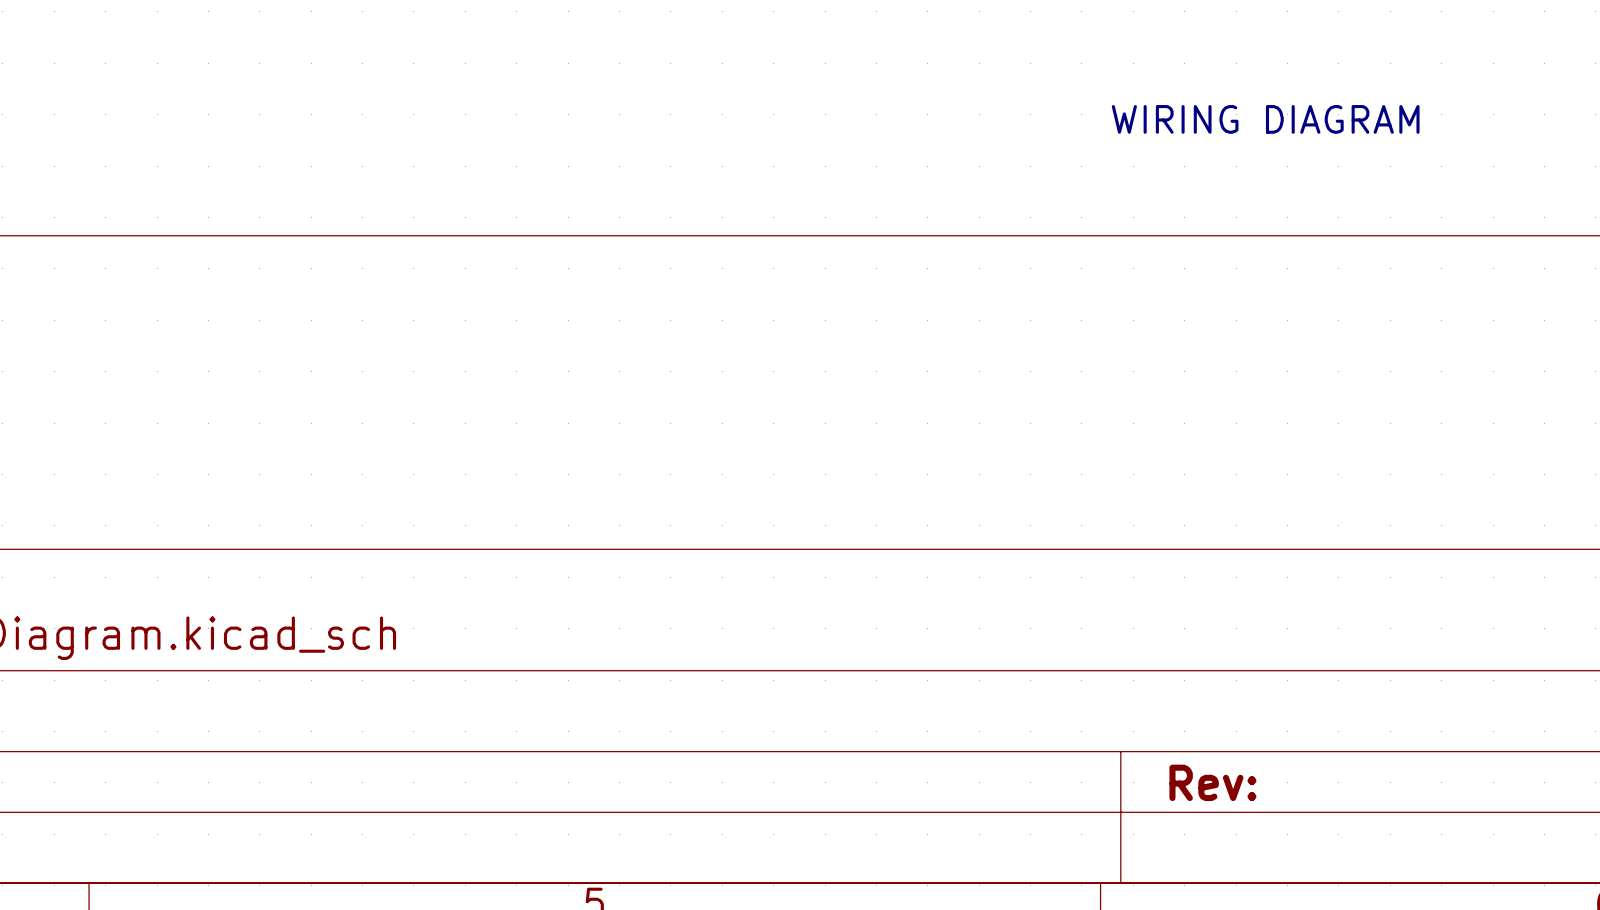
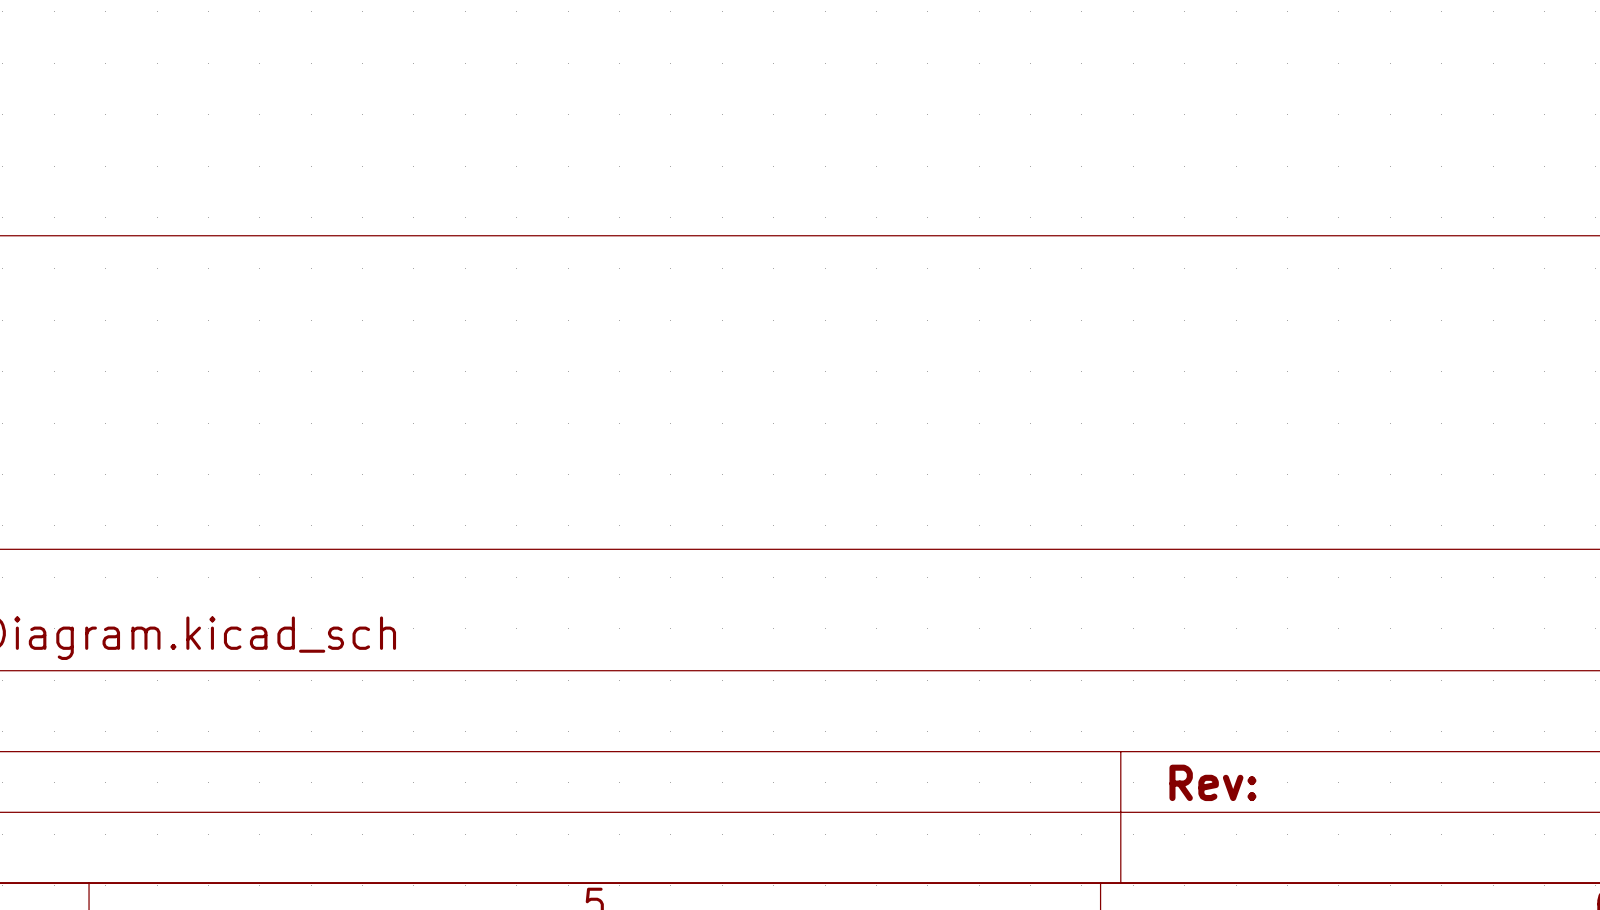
text: WIRING DIAGRAM (1265, 119) -> none

